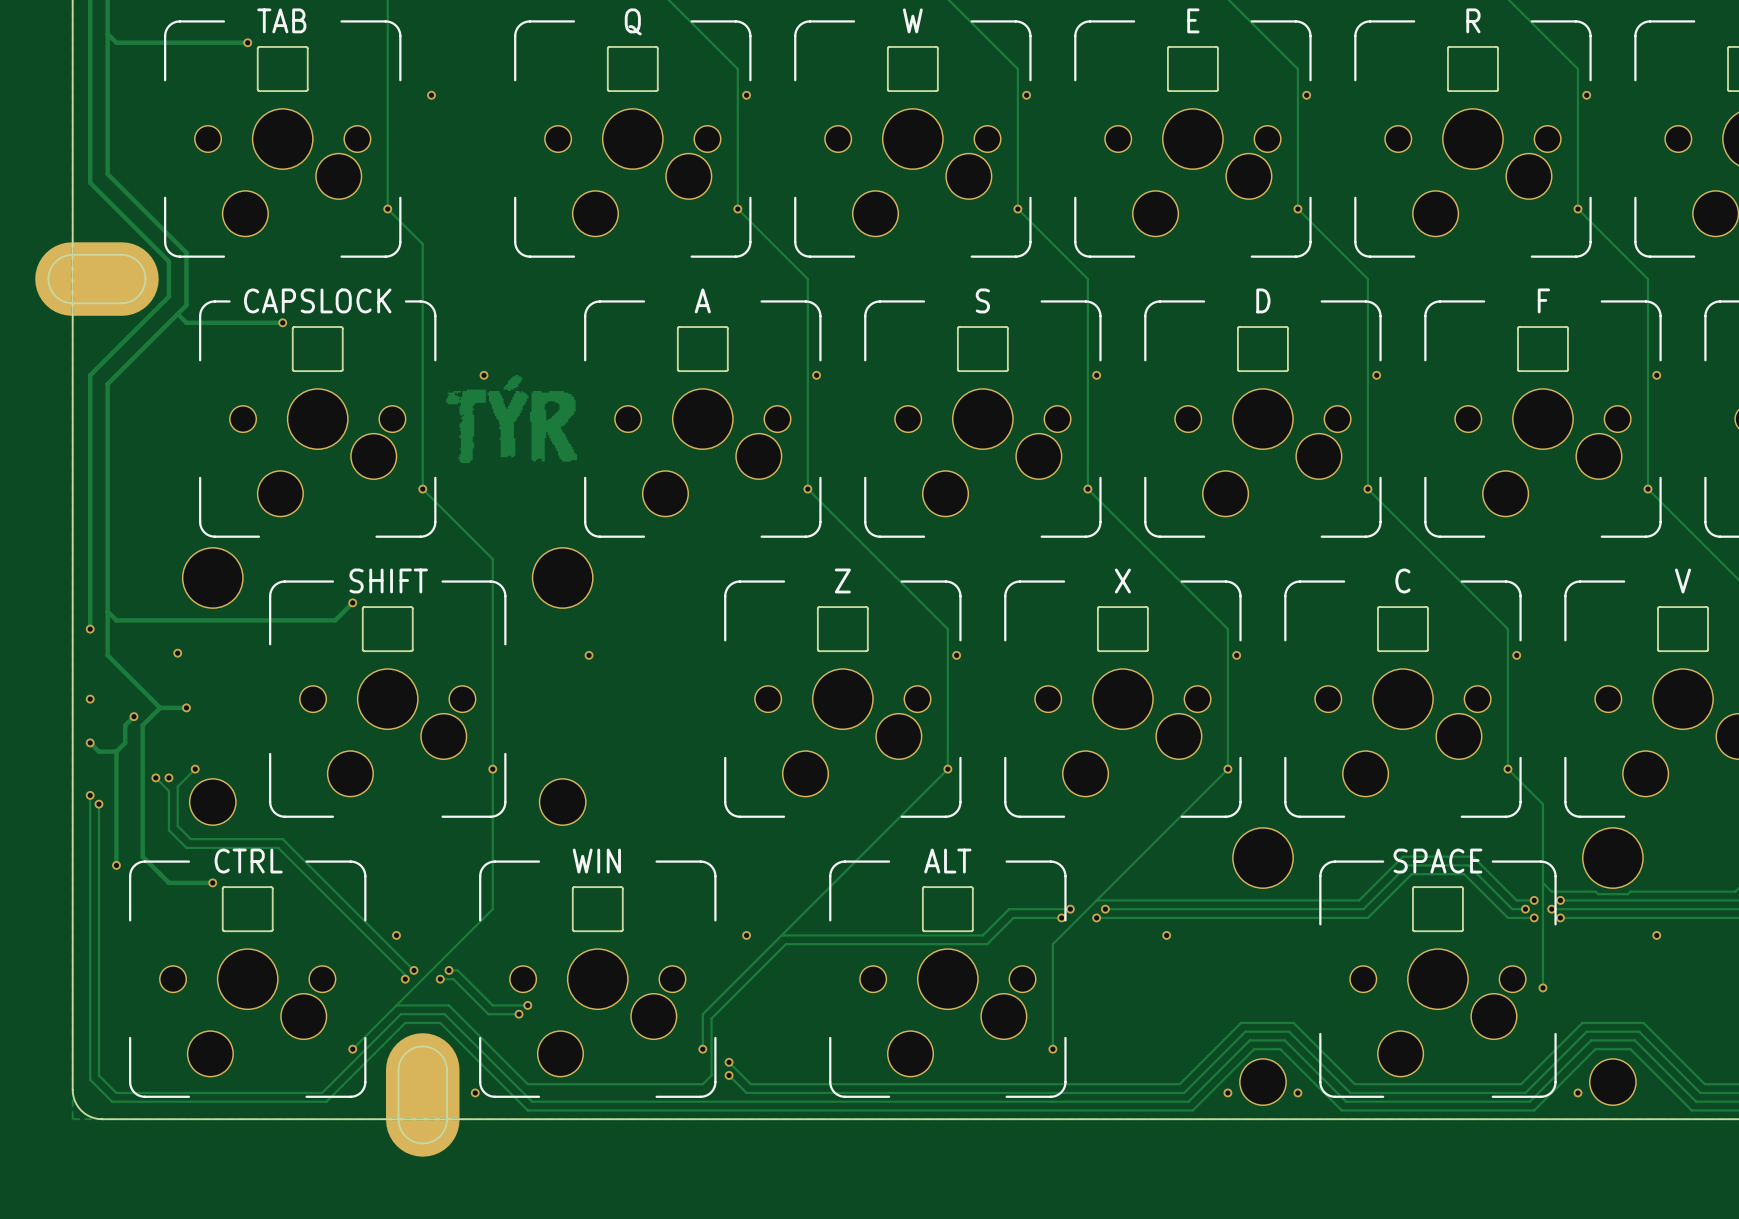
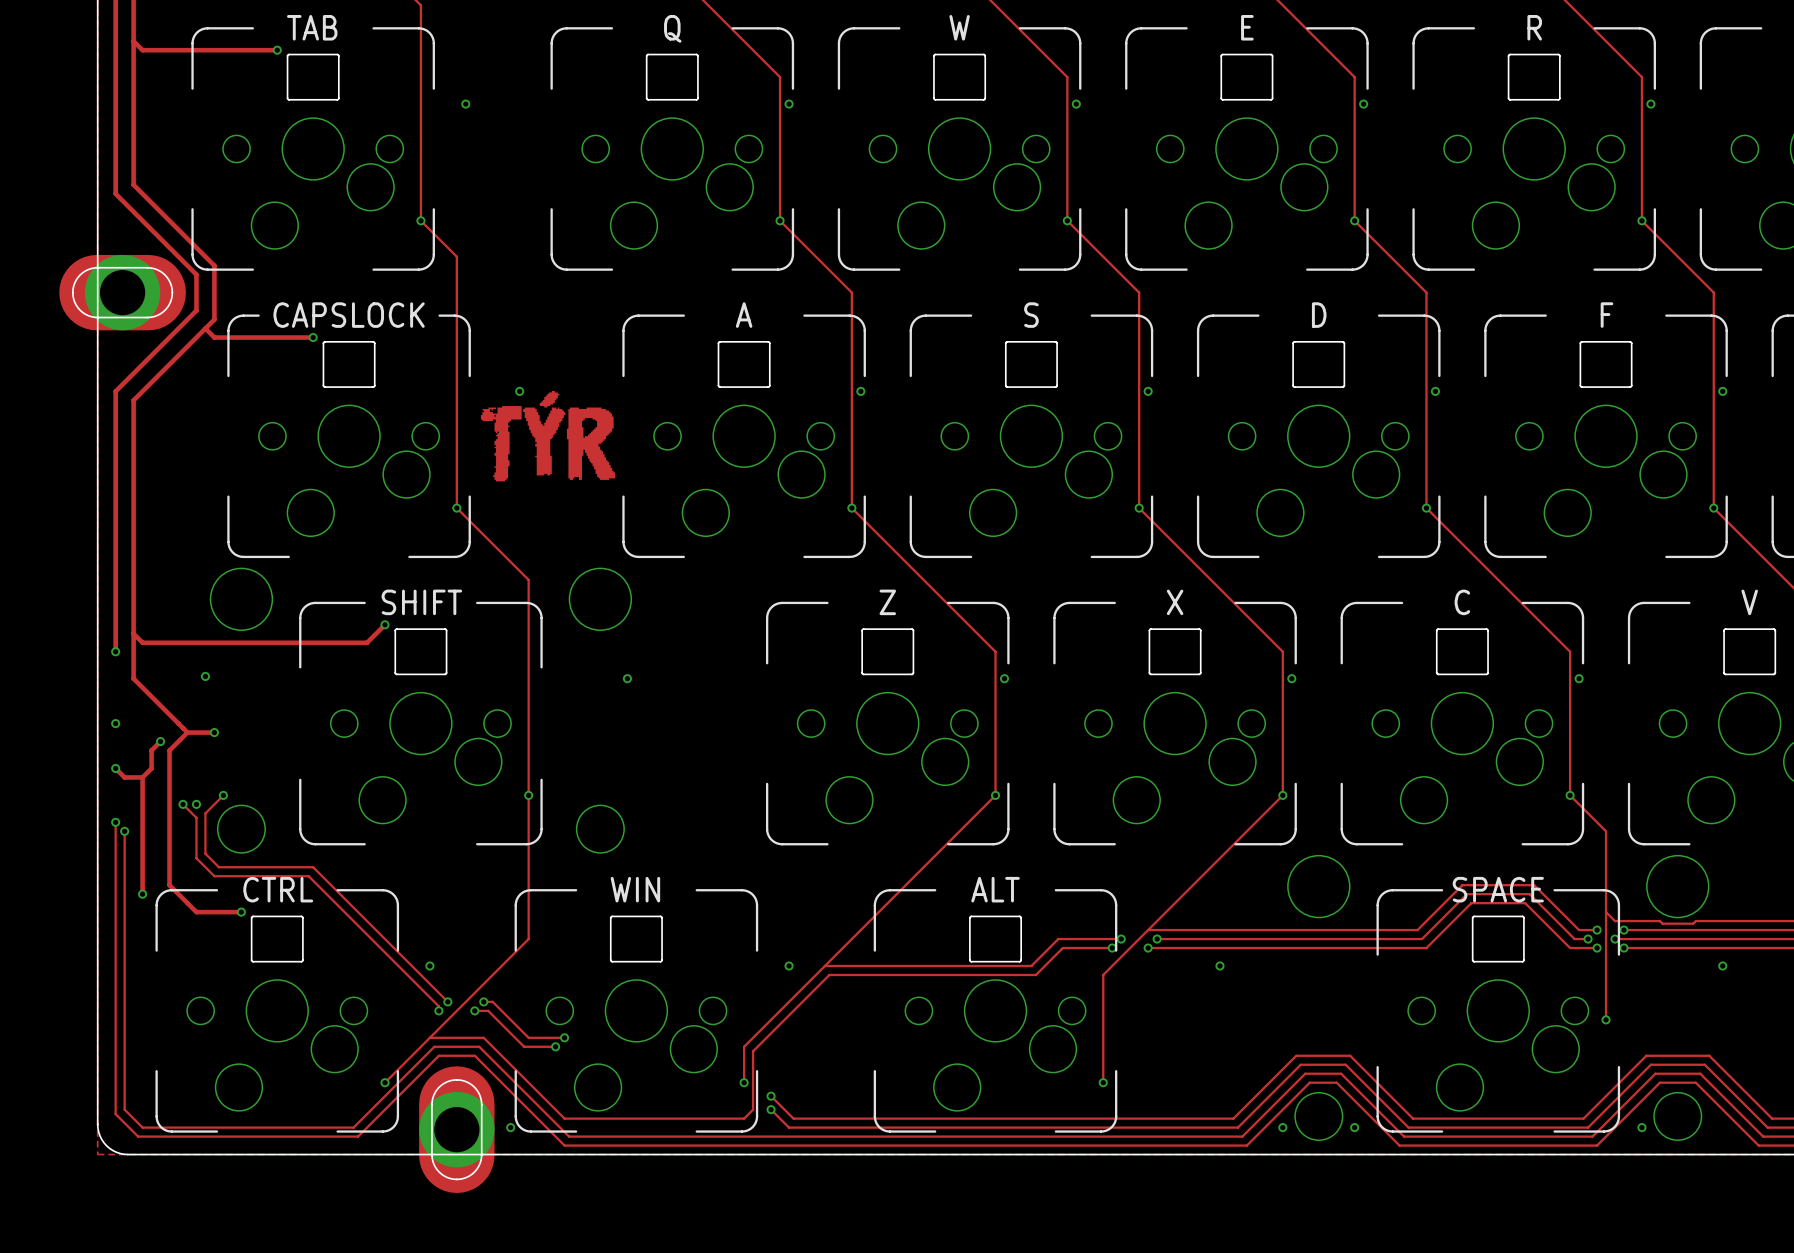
part footprint: [35, 242, 159, 316] -> [59, 254, 186, 331]
part footprint: [386, 1033, 460, 1157] -> [419, 1066, 495, 1193]

